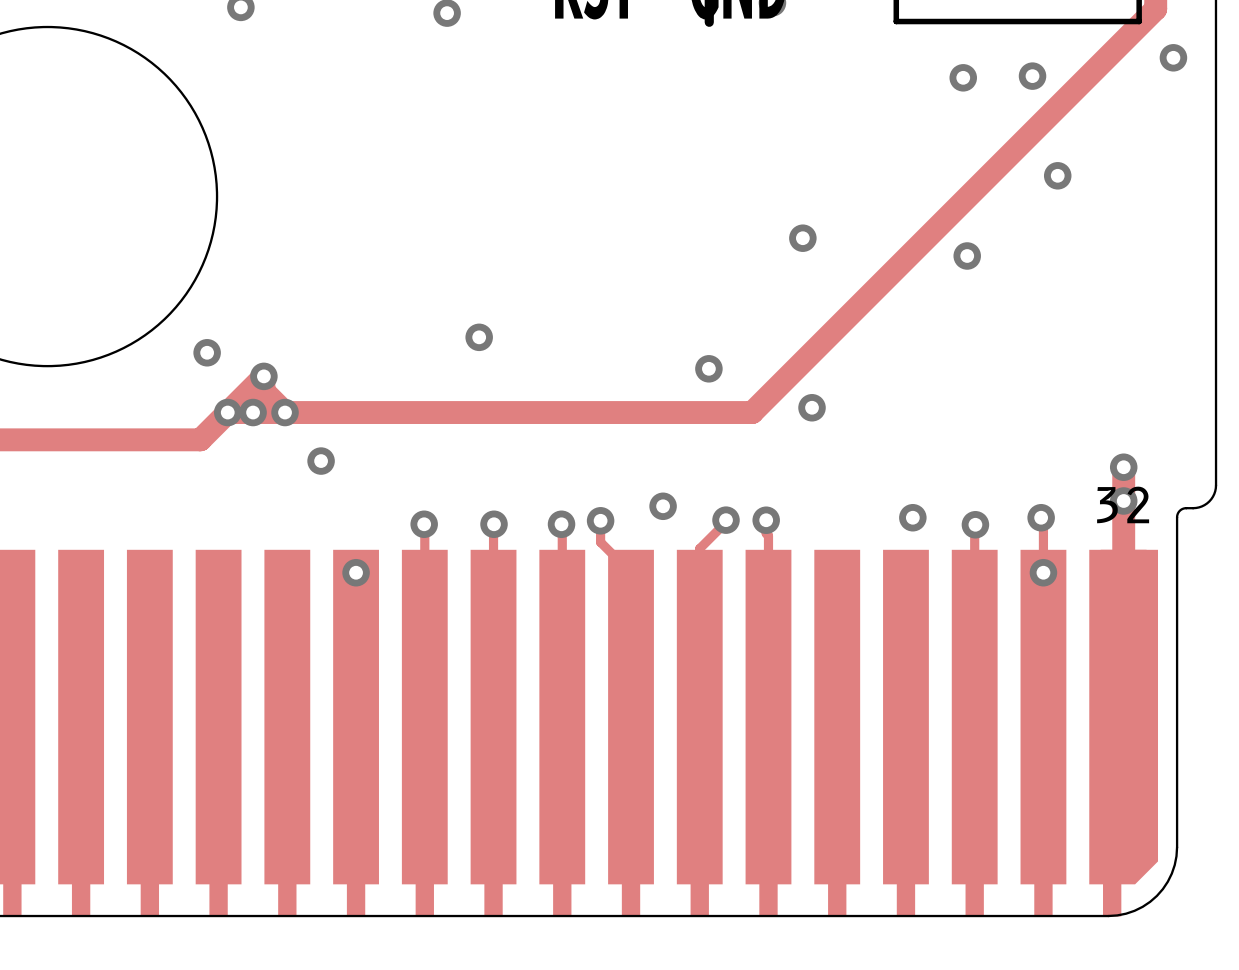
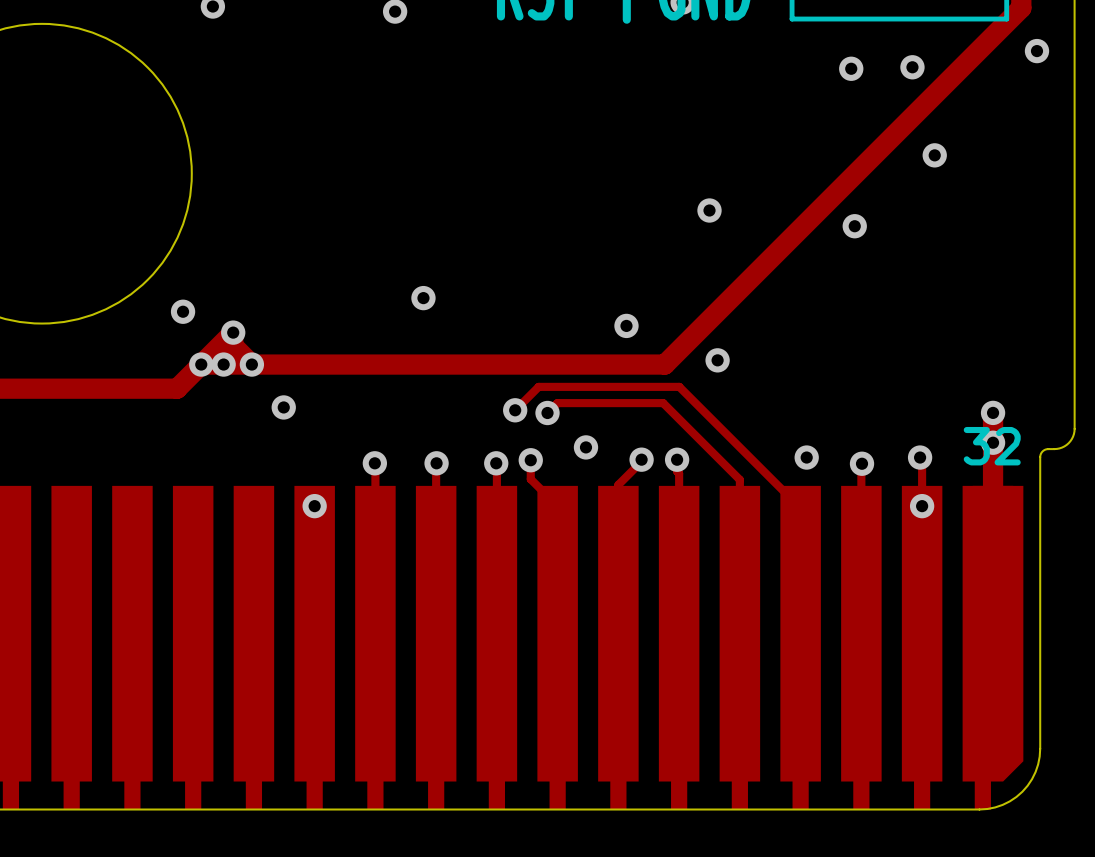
via: none -> (515, 410)
track: none -> (515, 410) (538, 386) (679, 386) (800, 506)
track: none -> (547, 412) (557, 403) (663, 403) (739, 479) (739, 506)
via: none -> (547, 412)

